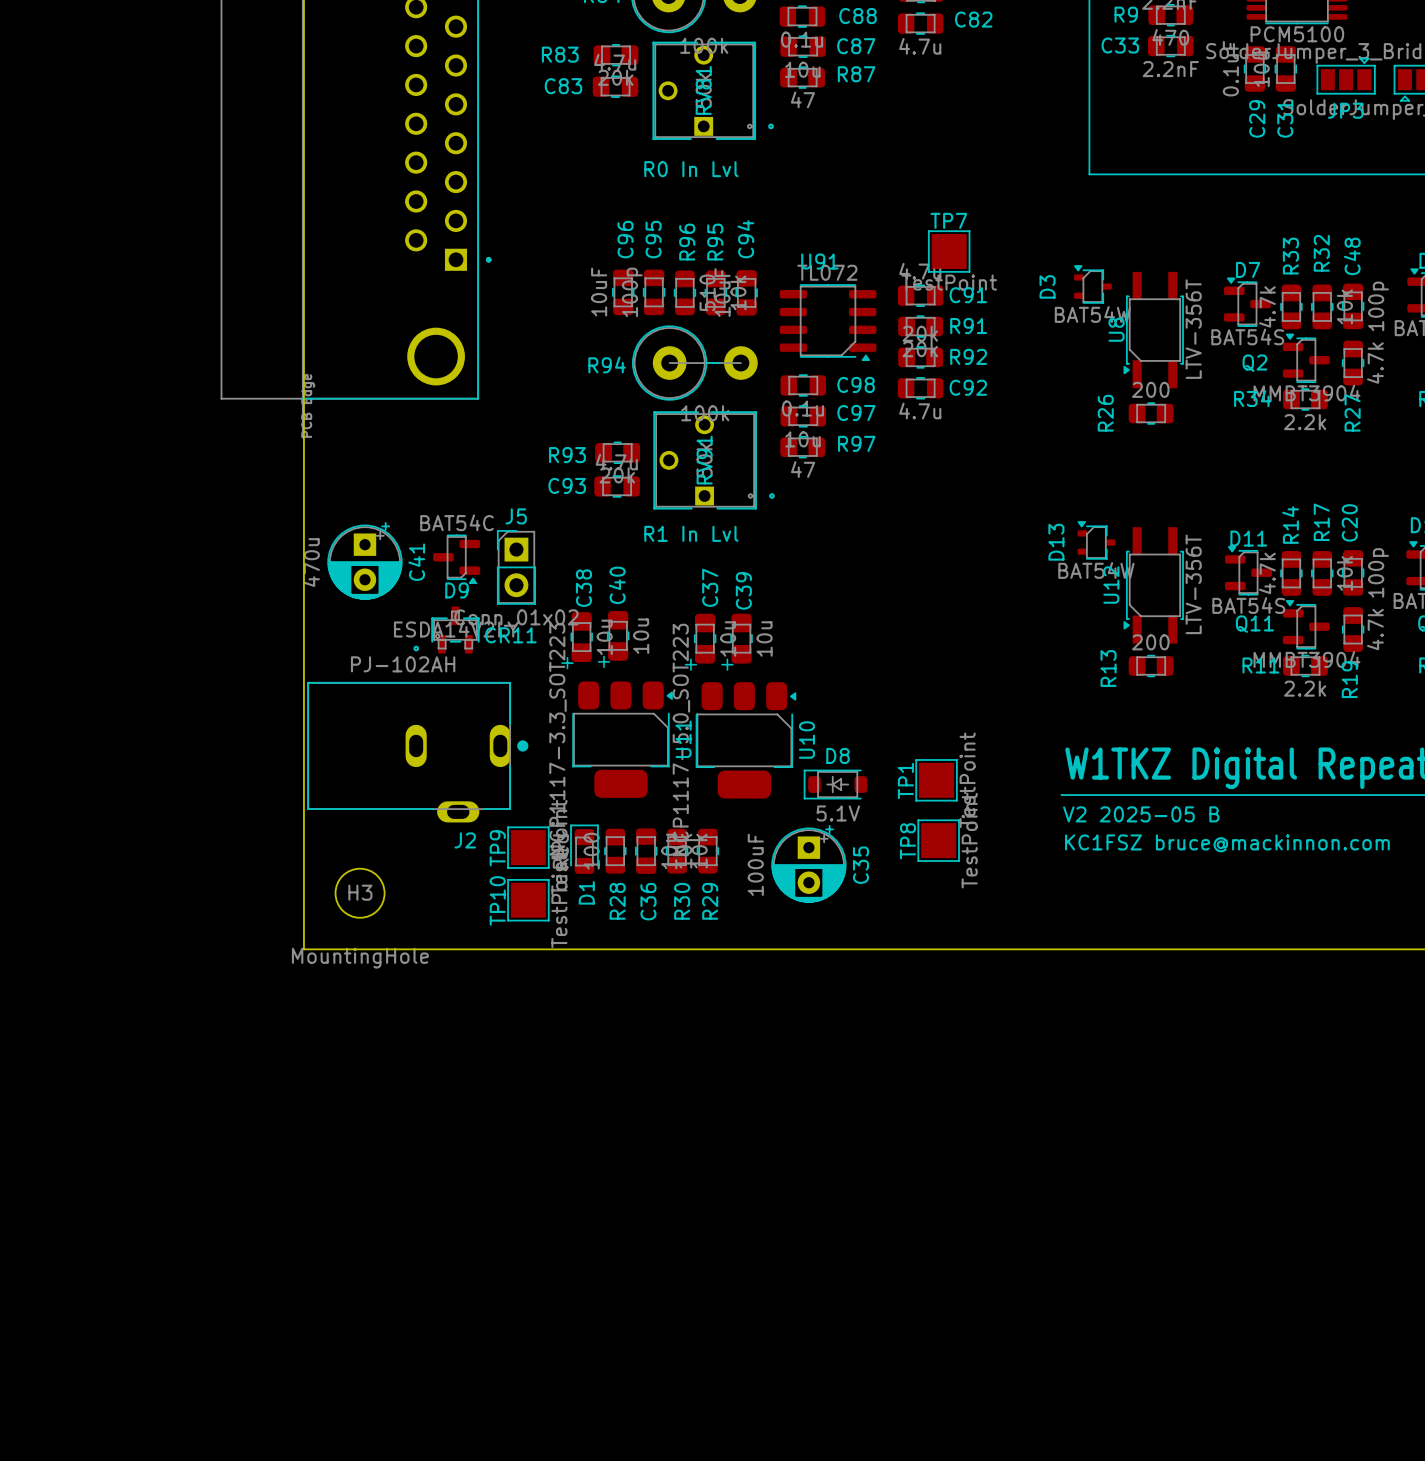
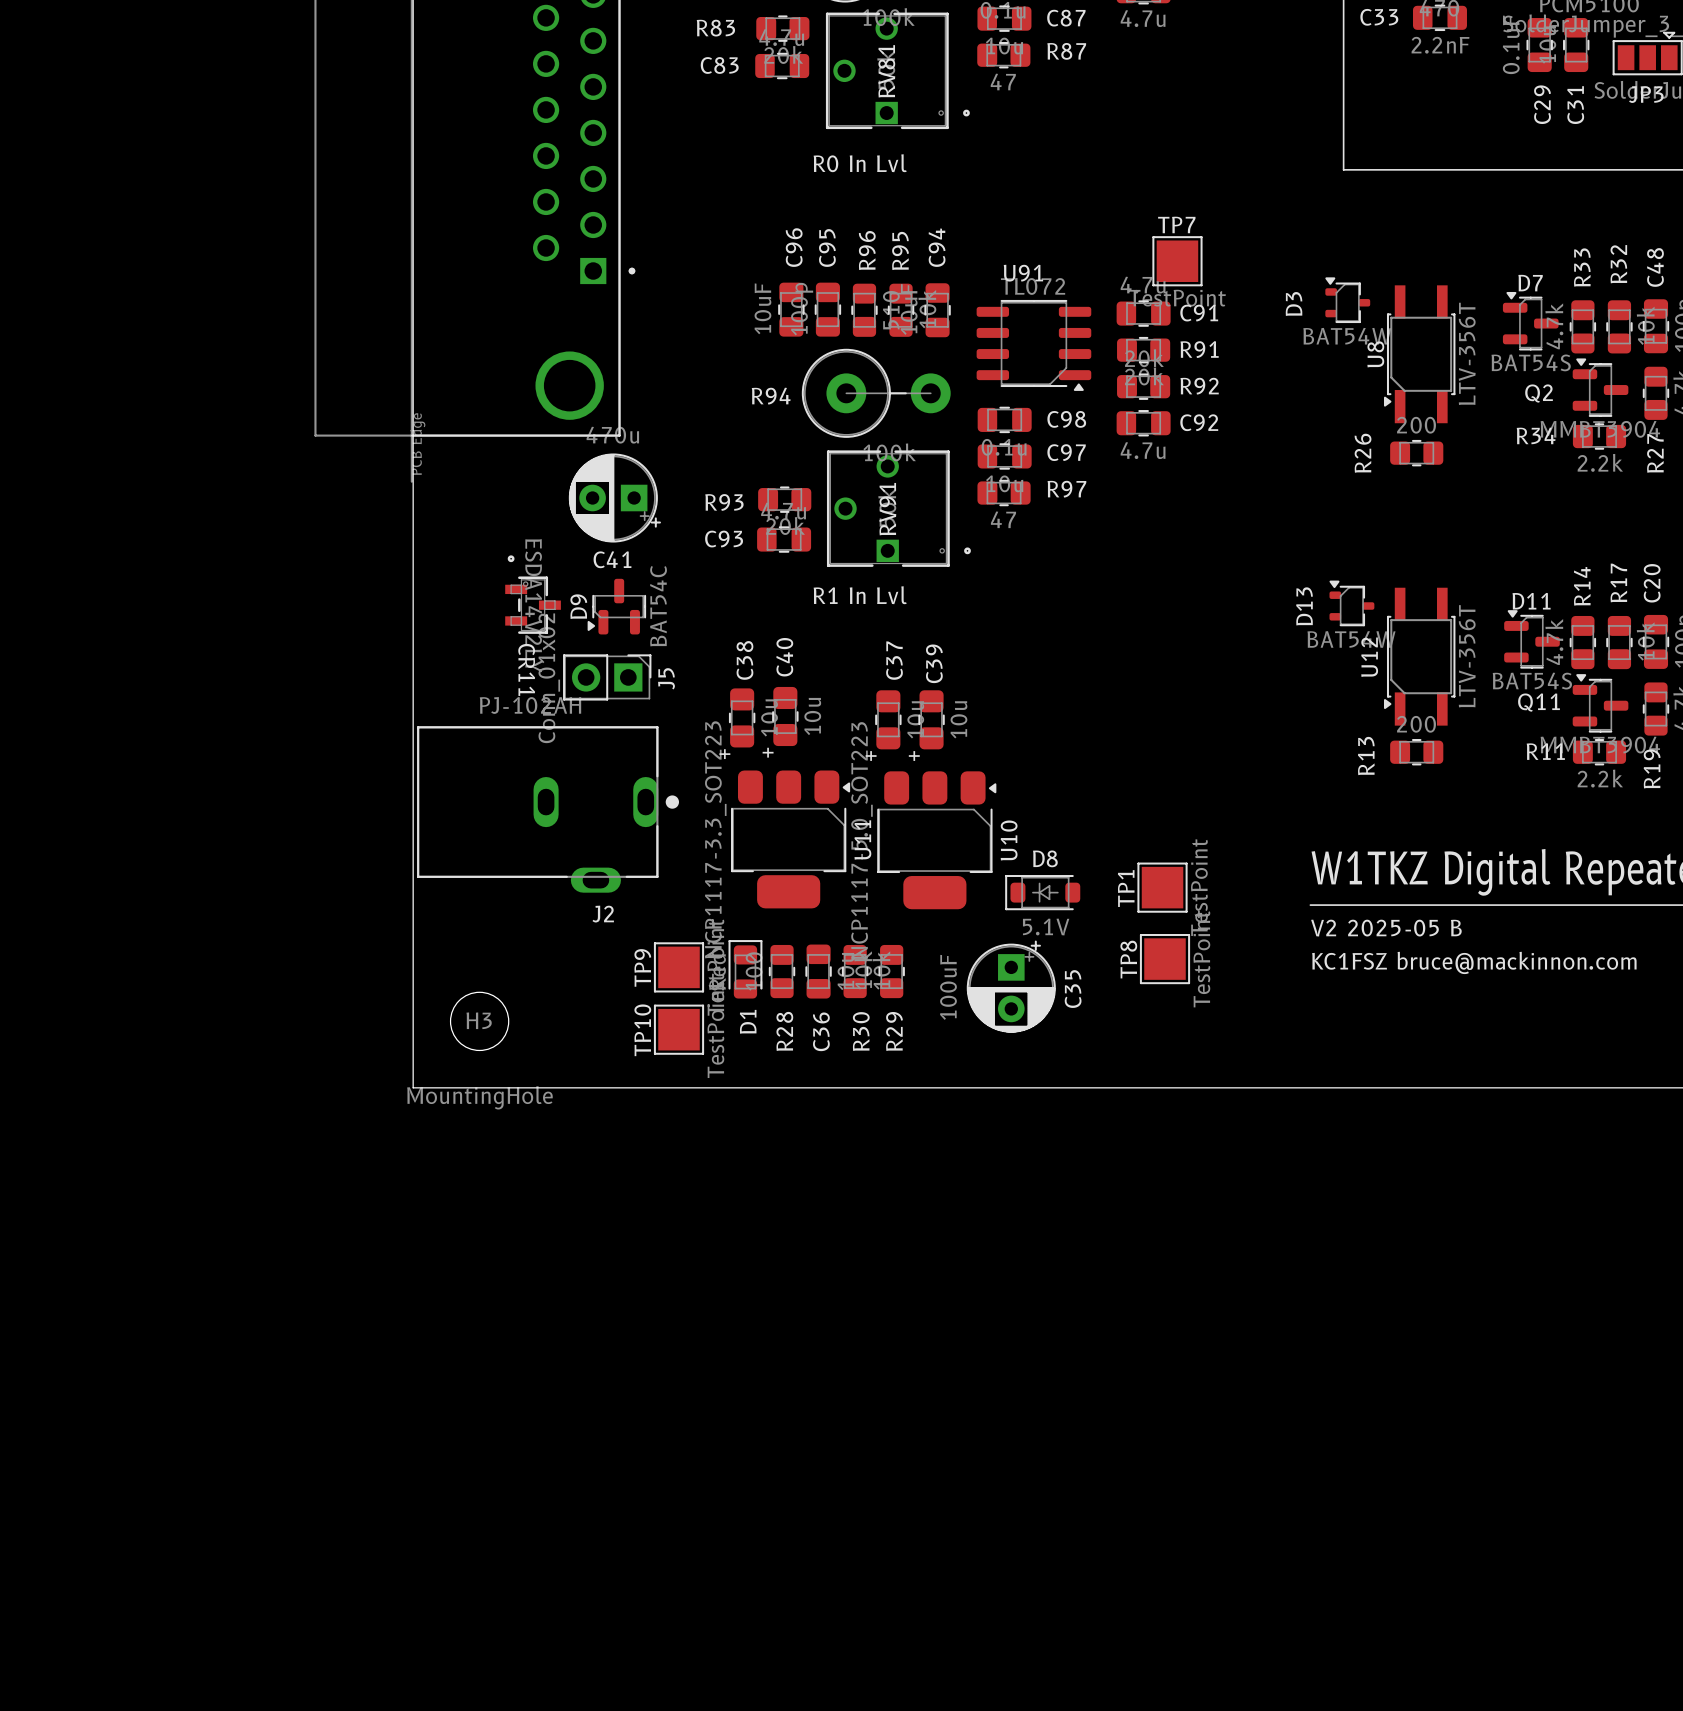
D9 rotation: 0° (456, 559) -> 90° clockwise (616, 606)
C41 rotation: 0° (364, 560) -> 90° clockwise (614, 498)
C41 position: (364, 560) -> (614, 498)
J5 rotation: 0° (516, 567) -> 90° clockwise (607, 677)
J5 position: (516, 567) -> (607, 677)
CR11 rotation: 0° (446, 630) -> 90° clockwise (533, 594)
CR11 position: (446, 630) -> (533, 594)
J2 position: (417, 752) -> (548, 809)

